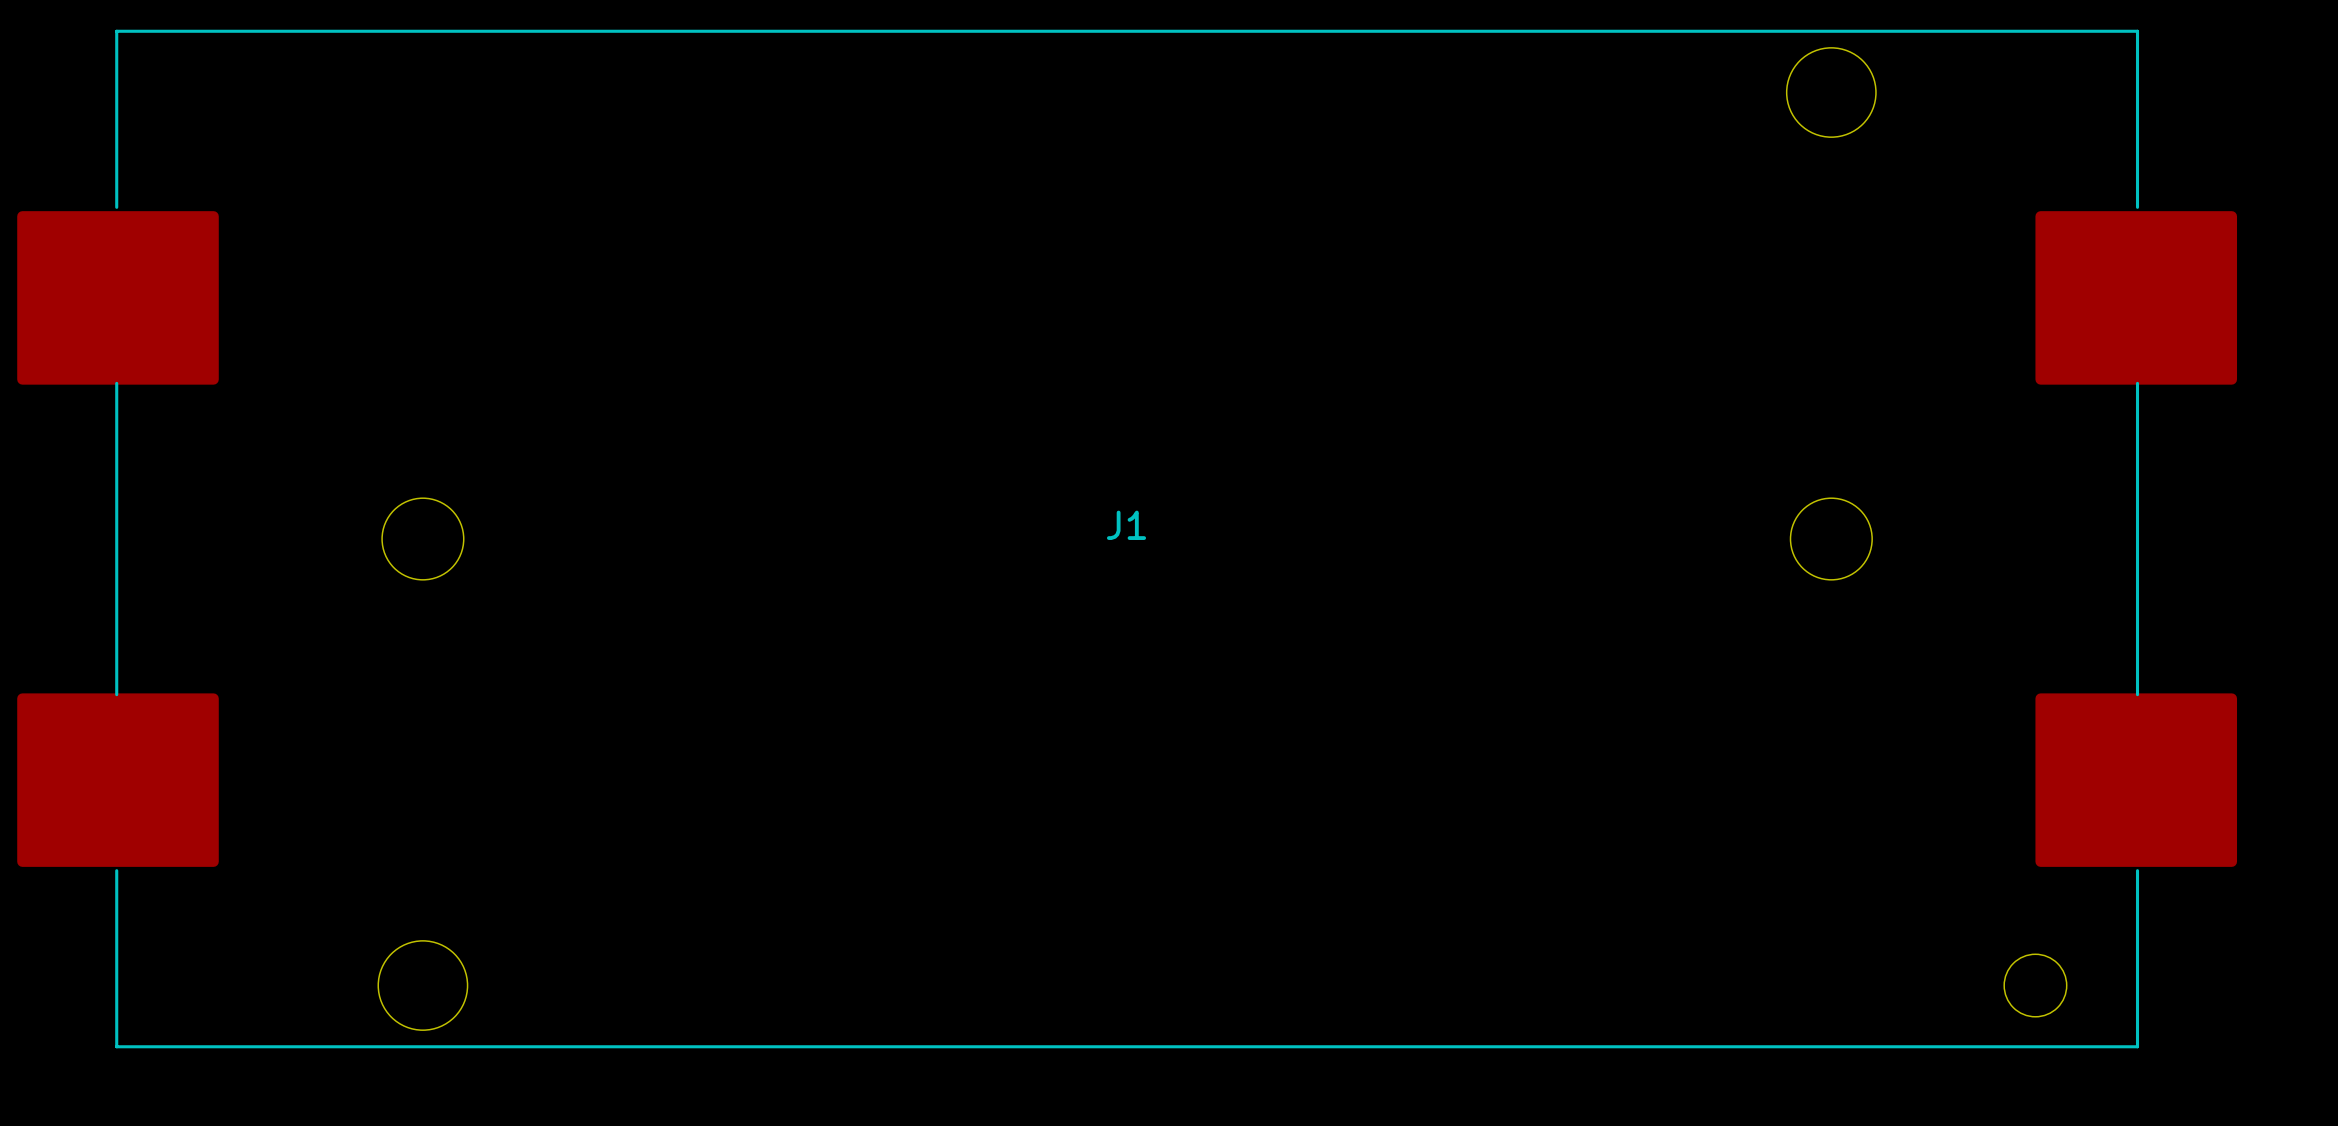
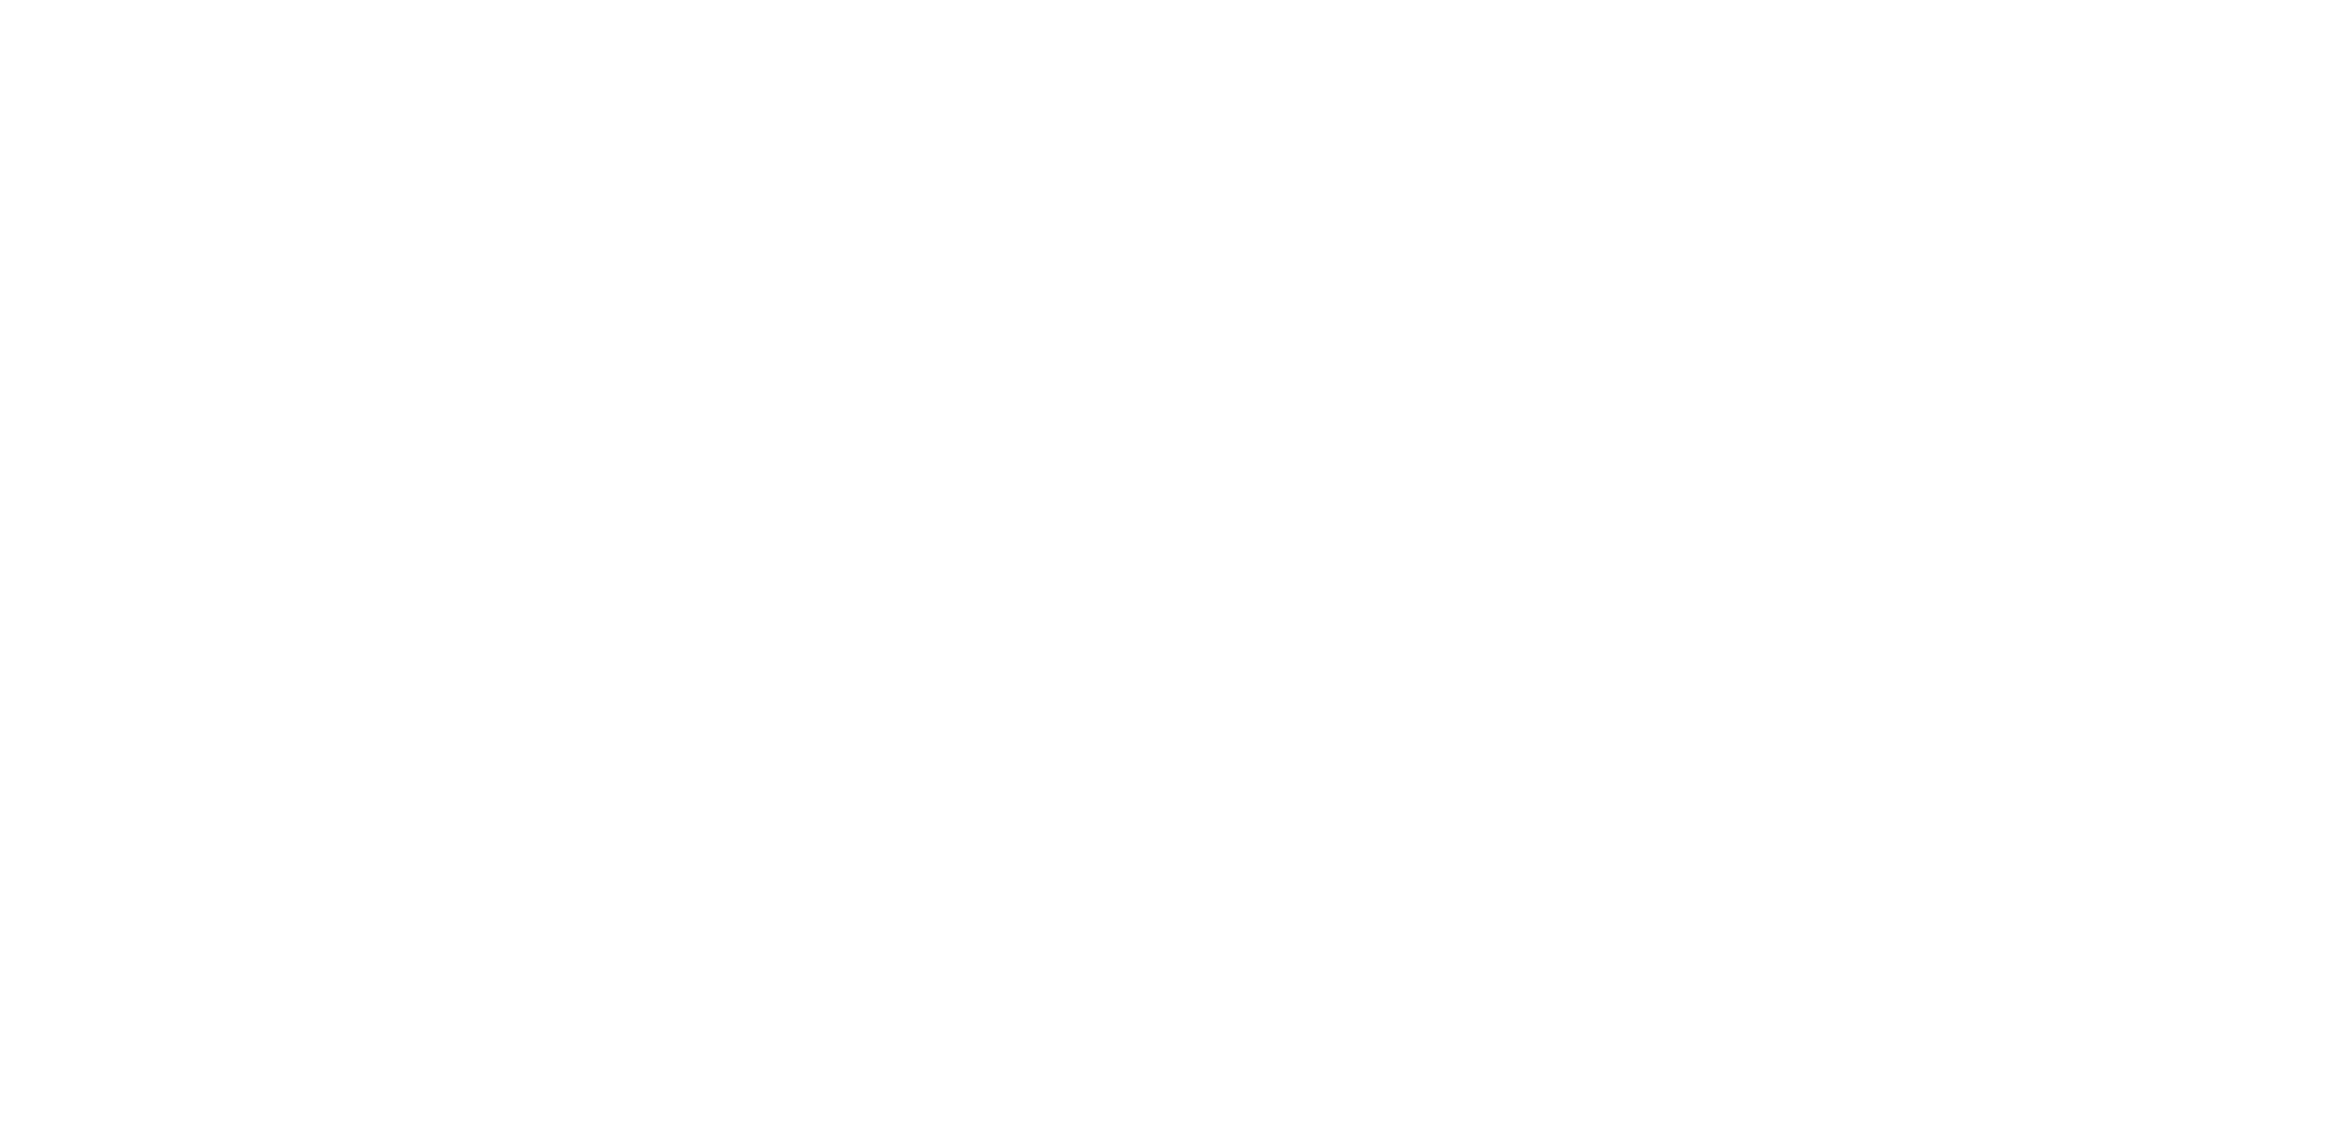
J1: (1127, 539) -> none

